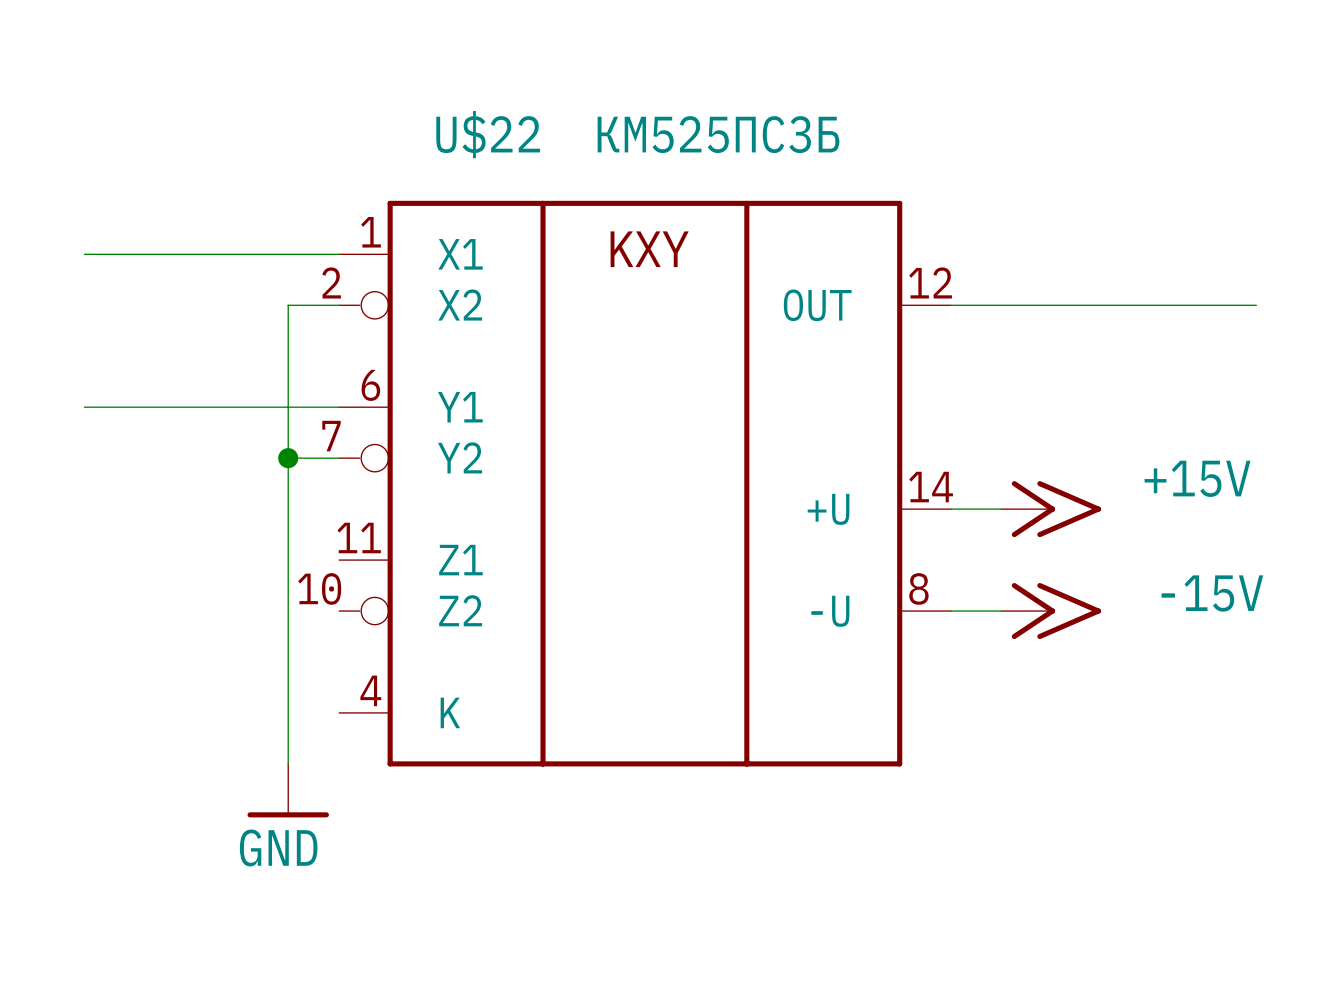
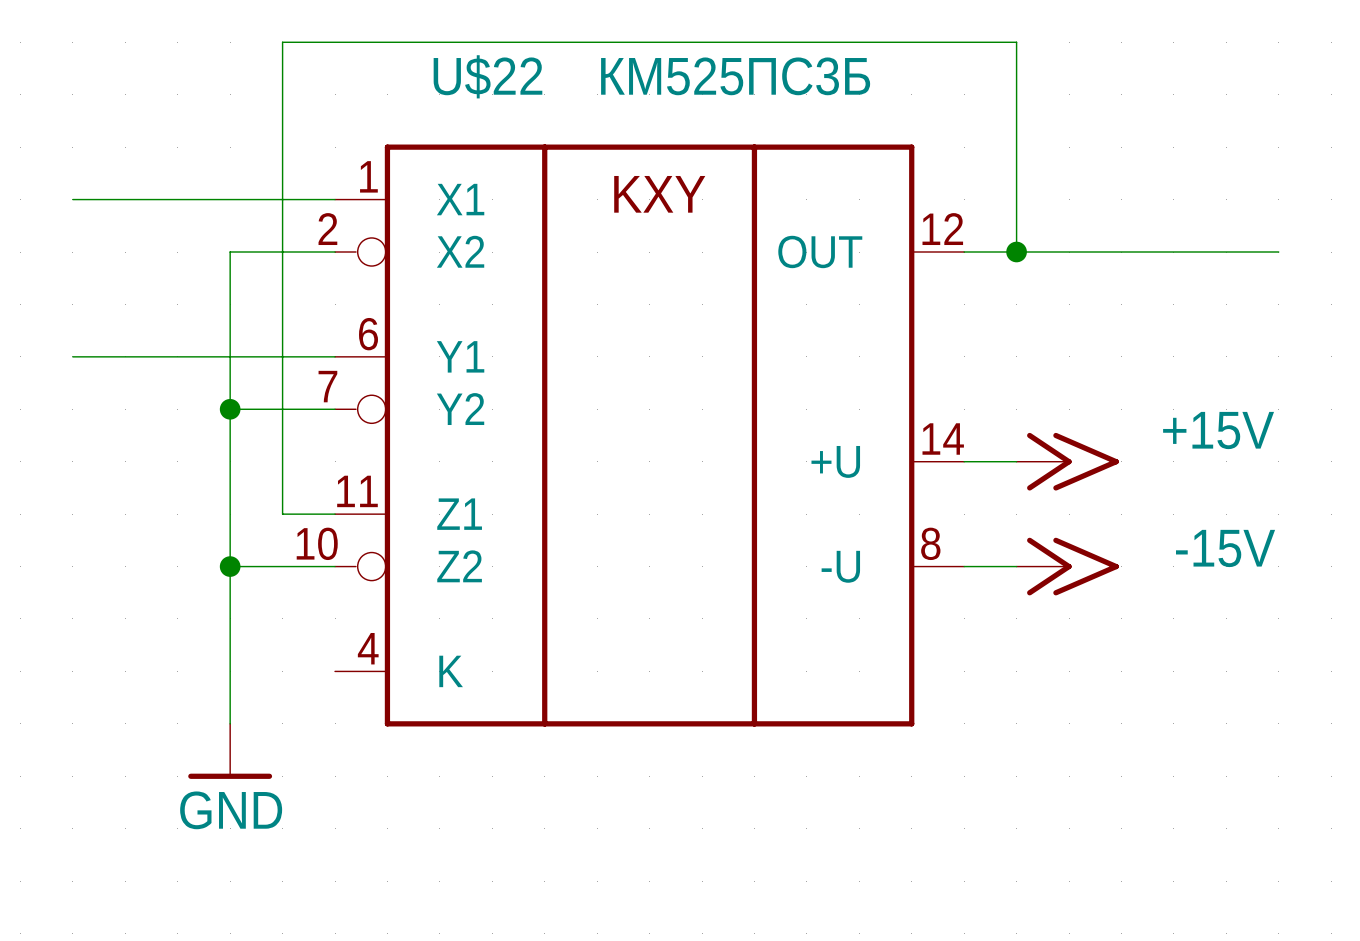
wire: none -> (1016, 252) (1016, 42) (282, 42) (282, 252) (230, 252) (230, 723)
junction: none -> (1016, 252)
wire: none -> (230, 409) (282, 409)
junction position: (288, 458) -> (230, 409)
wire: (288, 560) (288, 763) -> (282, 514) (335, 514)
wire: none -> (230, 566) (335, 566)
junction: none -> (230, 566)
power symbol position: GND (288, 790) -> GND (230, 751)

